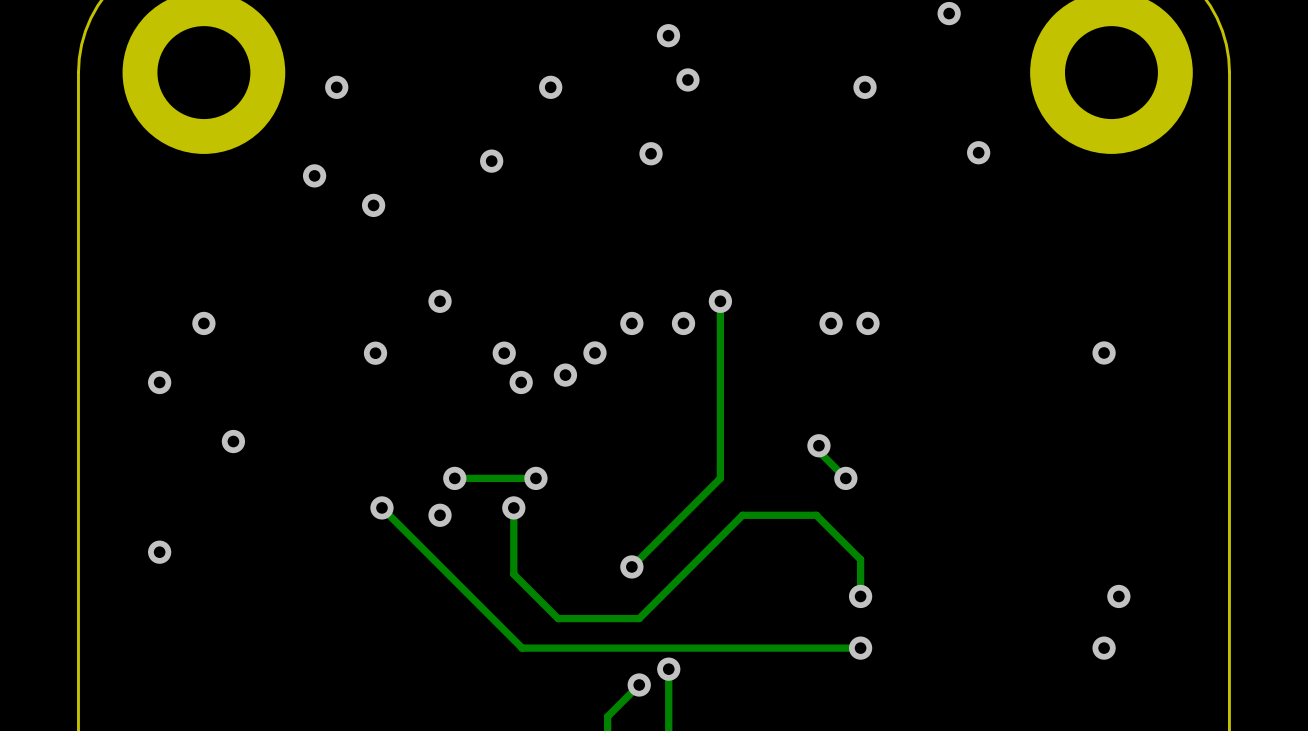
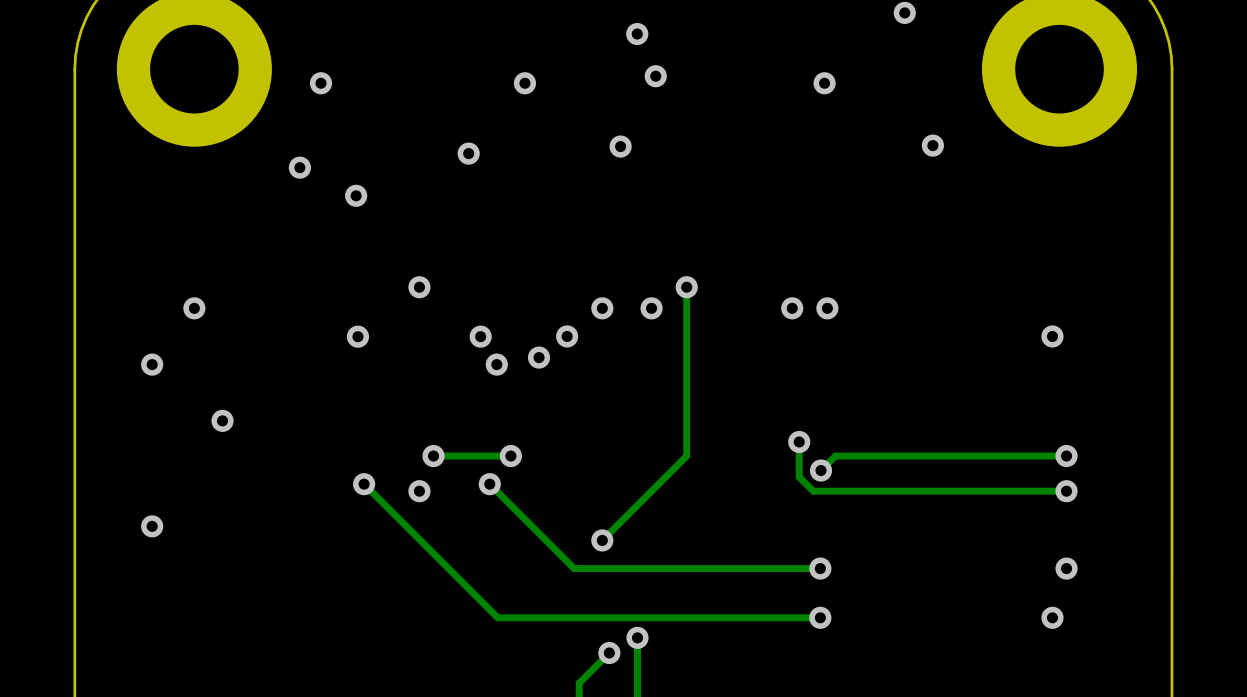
track: (818, 445) (818, 451) (845, 478) -> none
via: (818, 445) -> none
track: none -> (799, 441) (799, 477) (813, 491) (1066, 491)
via: none -> (799, 441)
via: (845, 478) -> none
track: none -> (1066, 456) (835, 456) (821, 470)
via: none -> (1066, 456)
via: none -> (821, 470)
track: (513, 507) (513, 574) (558, 618) (639, 618) (742, 515) (816, 515) (860, 559) (860, 596) -> (489, 484) (574, 568) (820, 568)
via: none -> (1066, 491)

